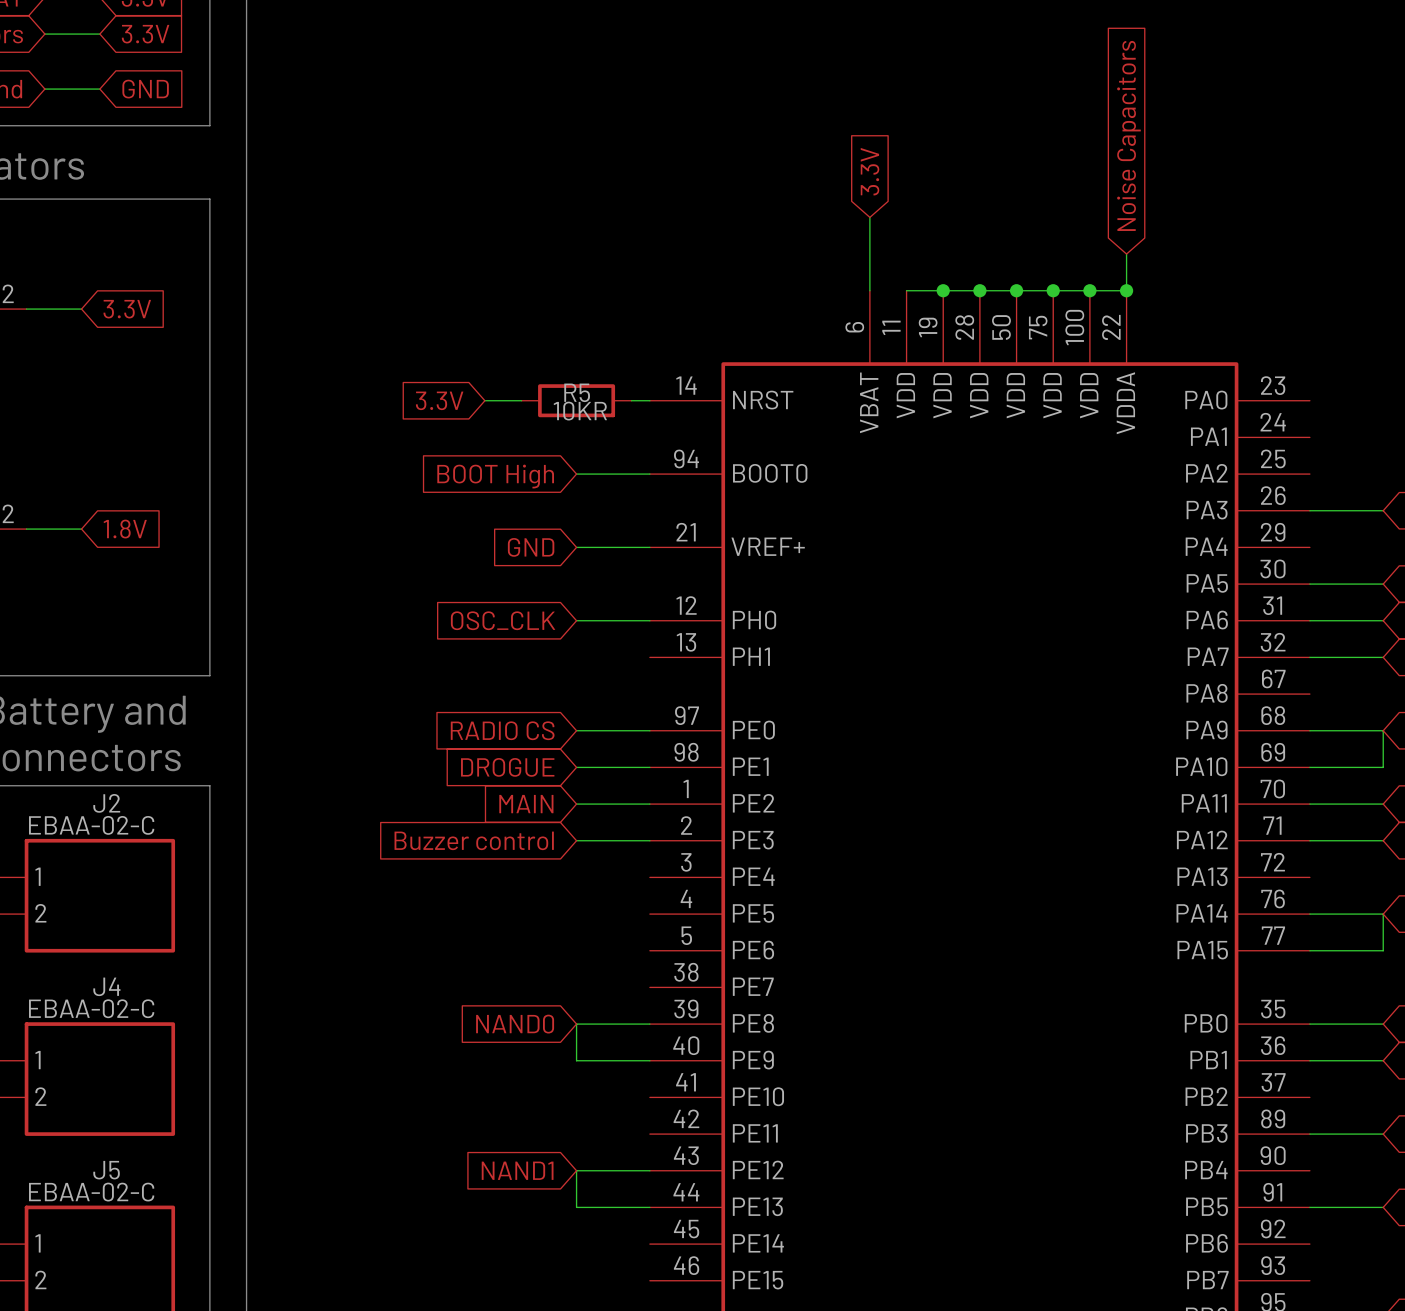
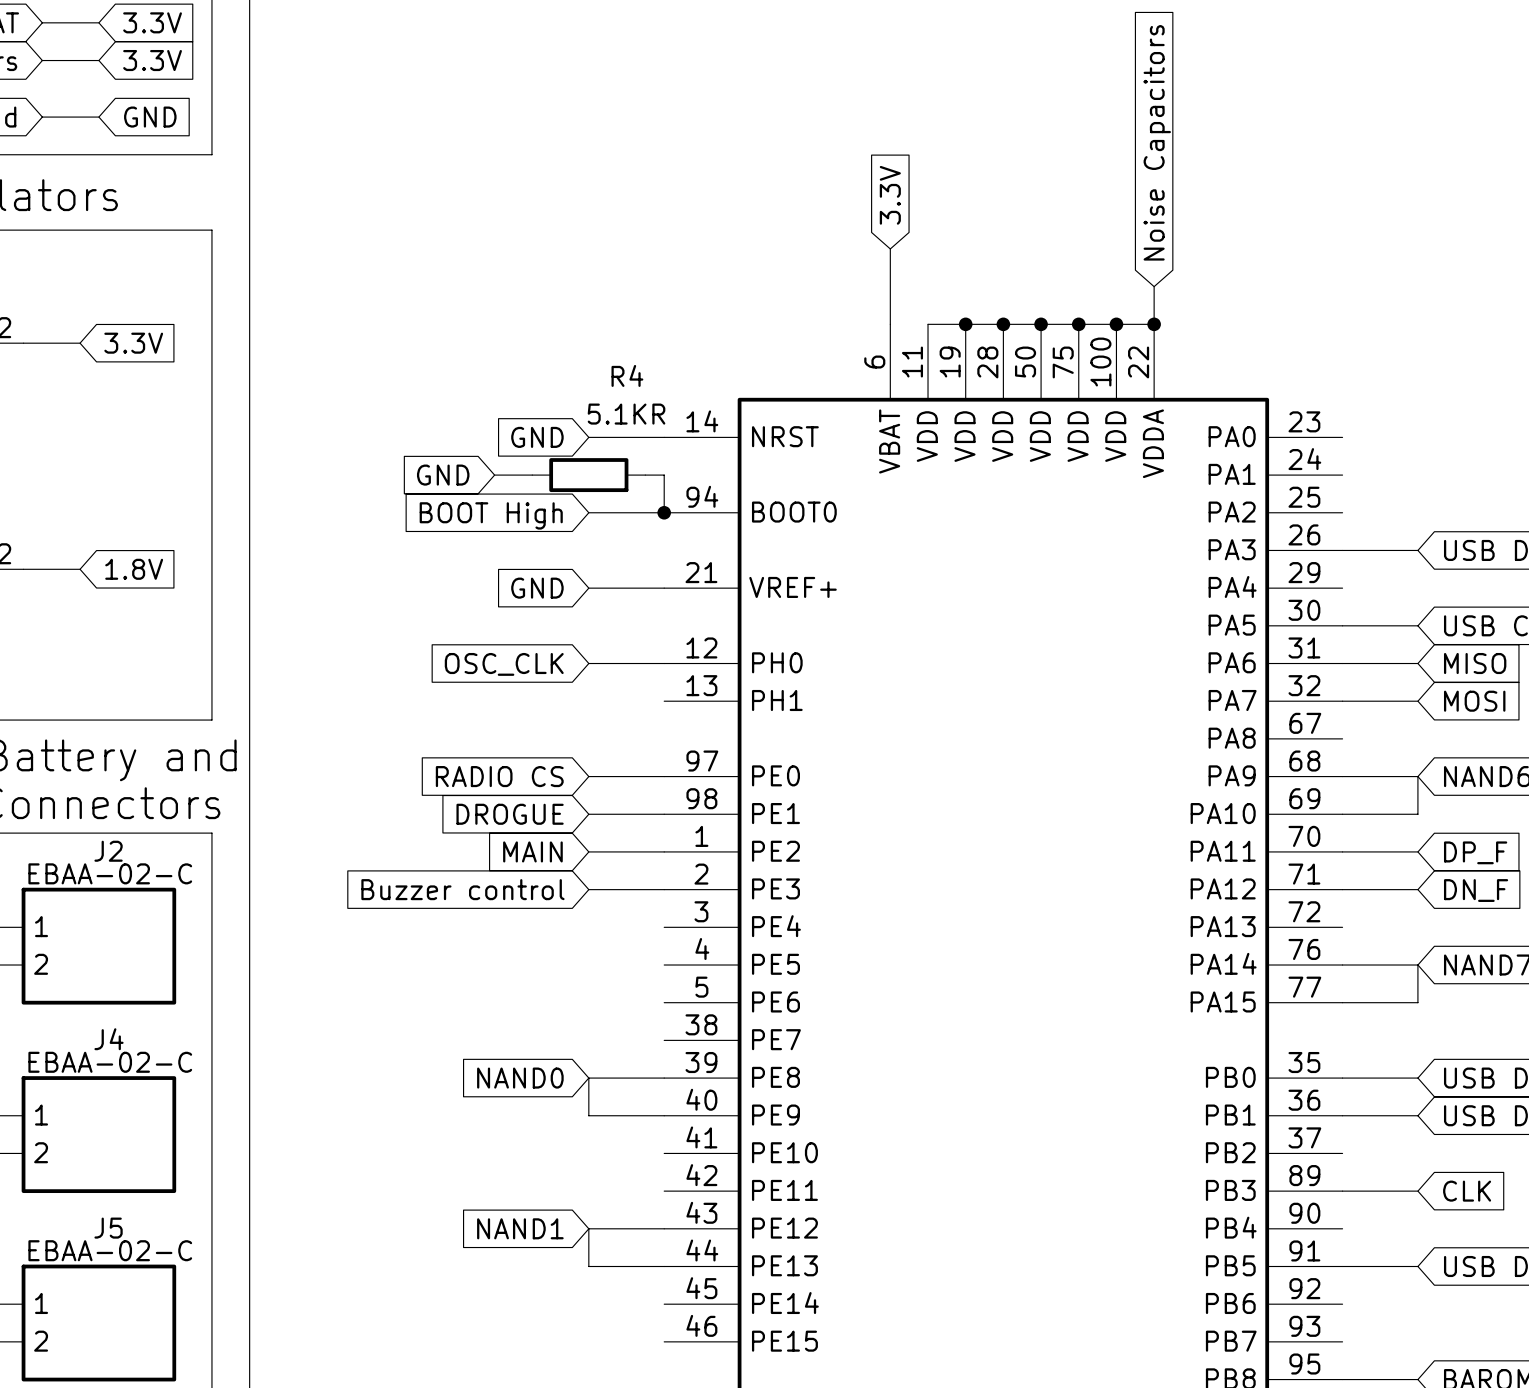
global label: 3.3V (439, 400) -> none
wire: (484, 400) (521, 400) -> (494, 475) (532, 475)
global label: none -> GND (537, 437)
wire: none -> (588, 437) (645, 437)
R5: 10KR (576, 400) -> none
global label: none -> GND (443, 475)
R4: none -> 5.1KR (588, 475)
wire: none -> (645, 475) (664, 475) (664, 512)
junction: none -> (664, 512)

